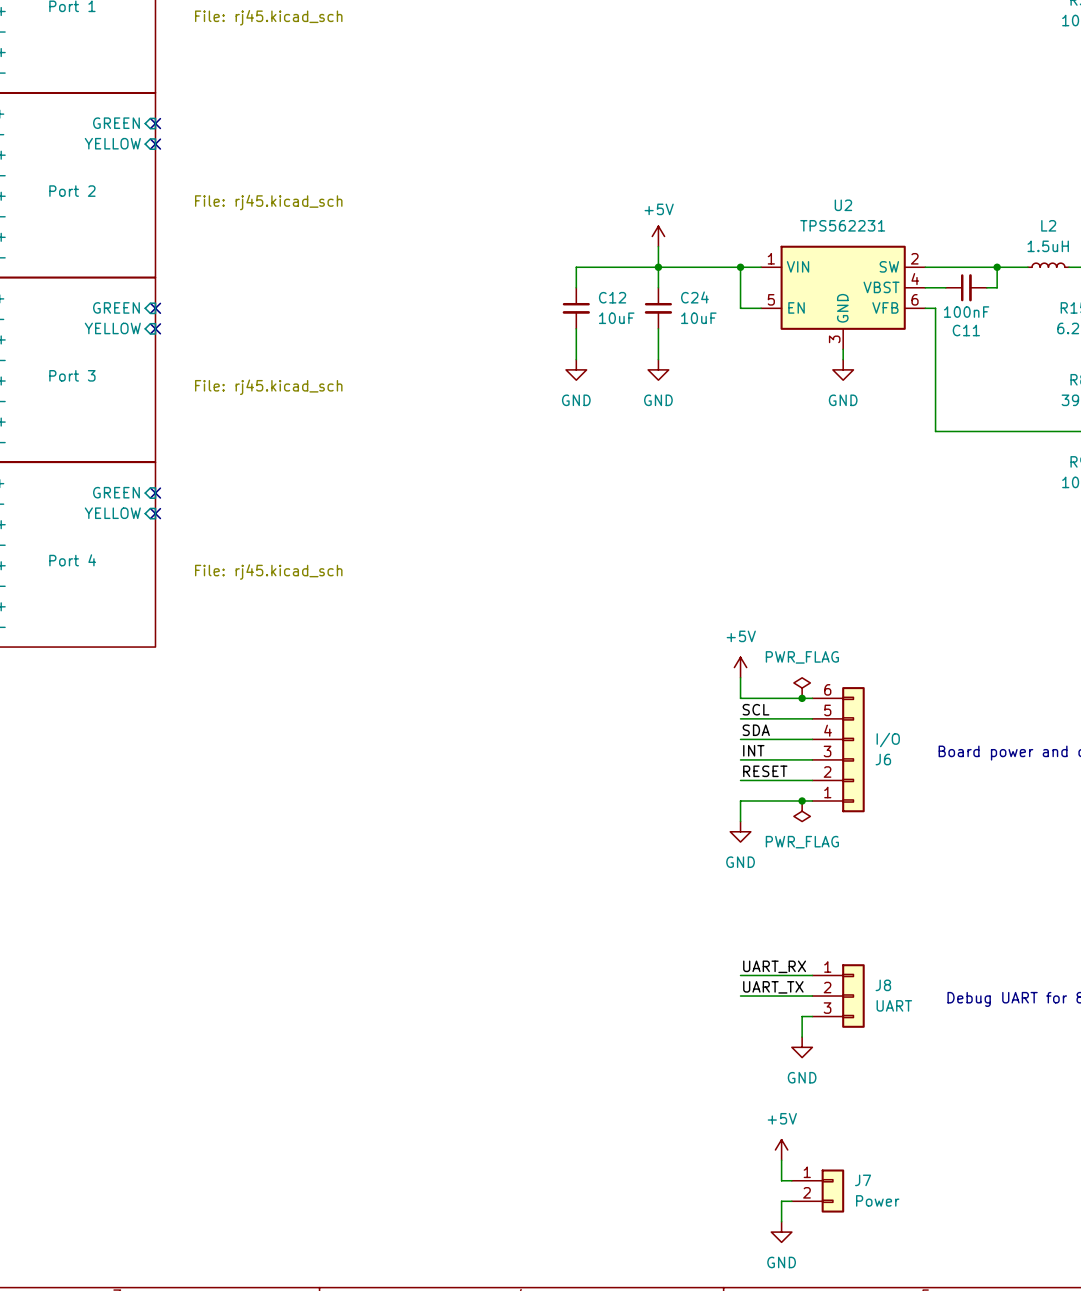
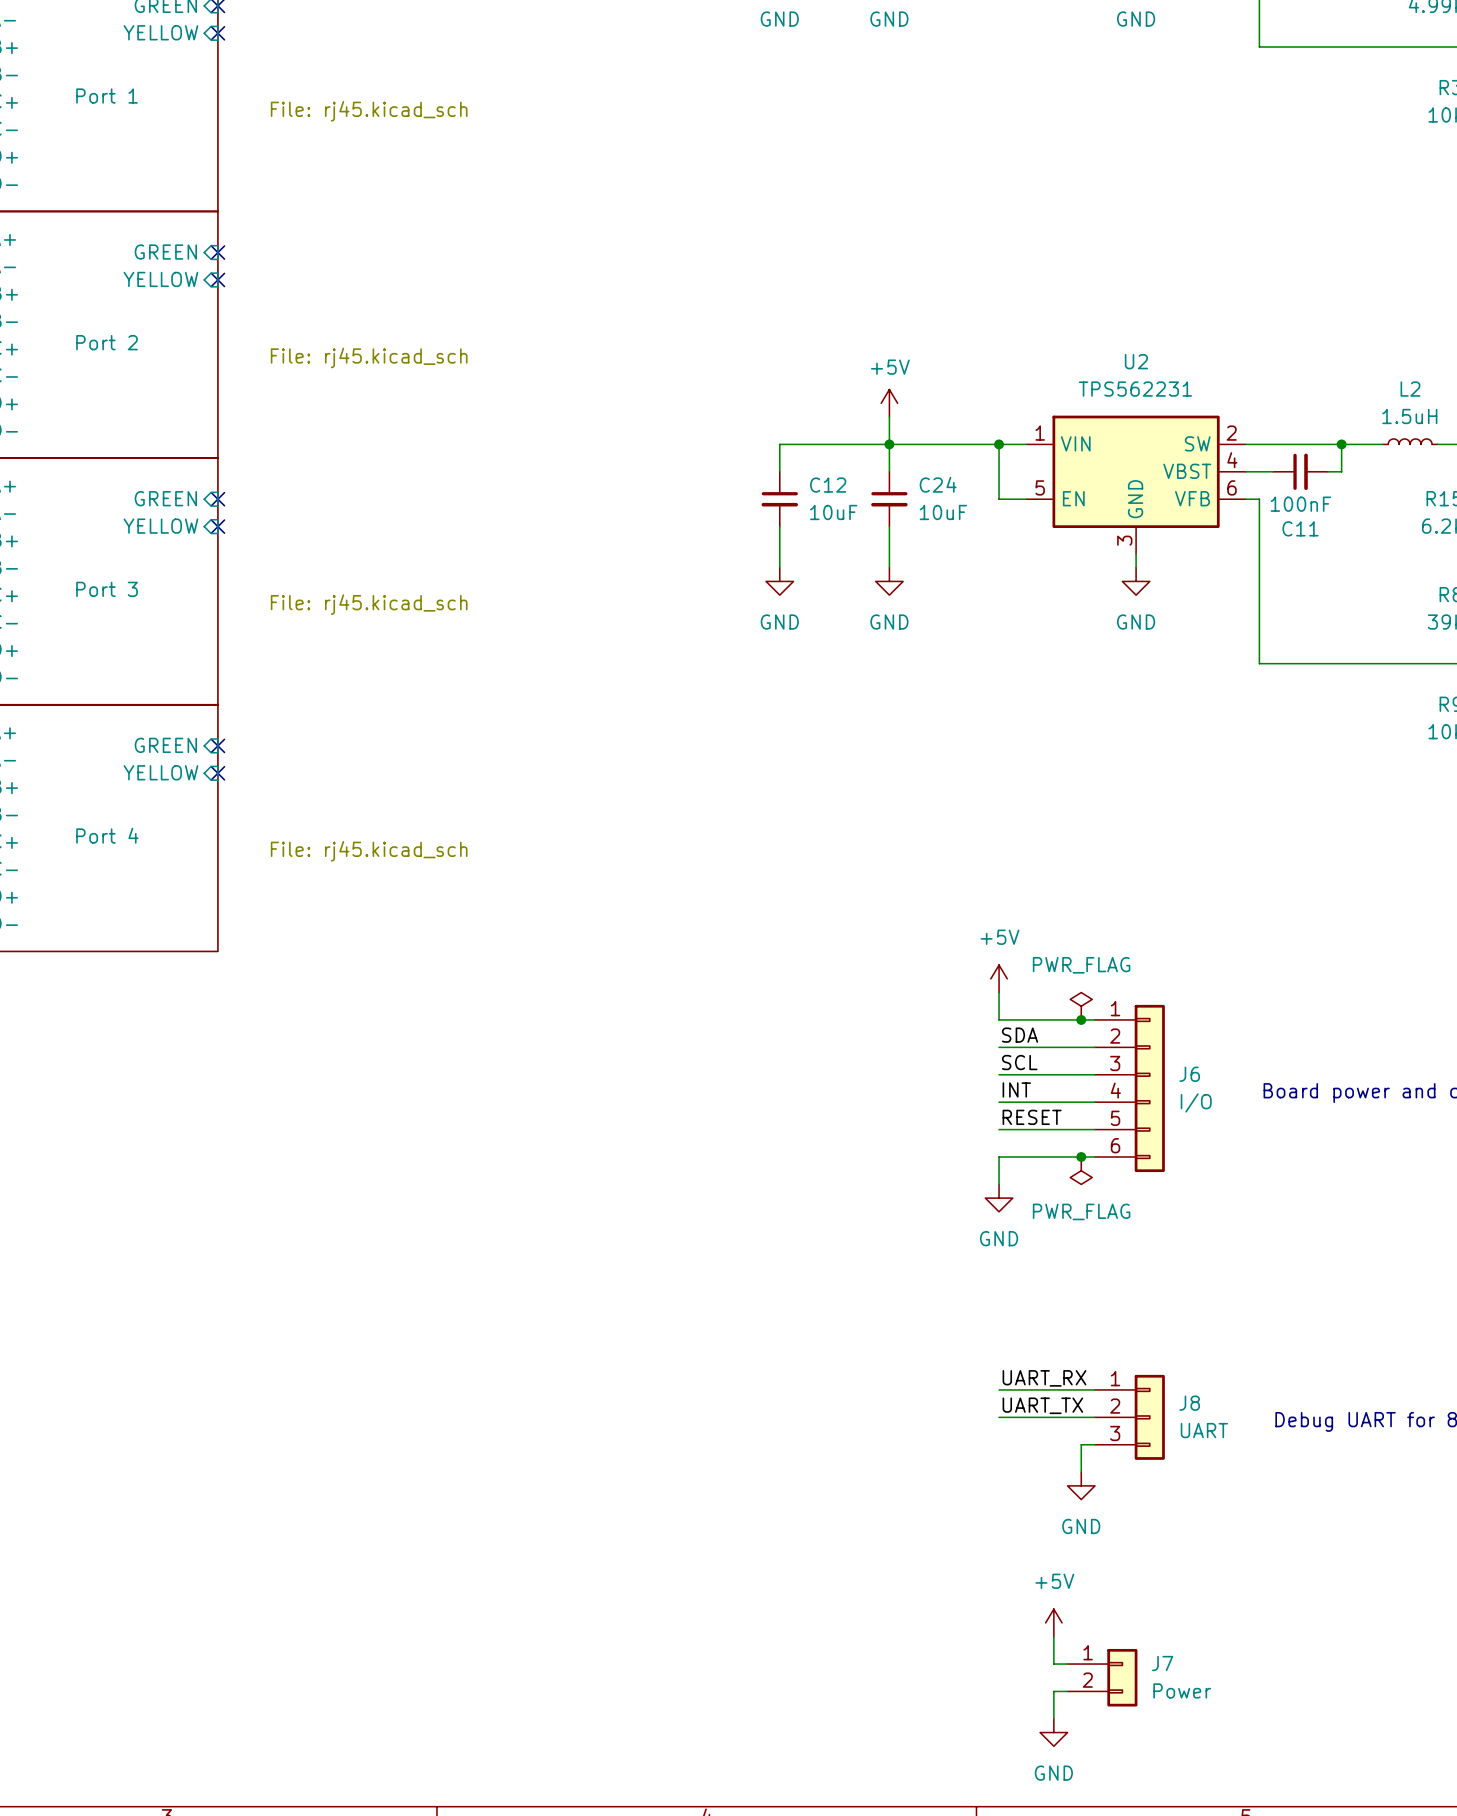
label: SCL (756, 709) -> SDA (1020, 1035)
label: SDA (756, 730) -> SCL (1019, 1062)
J6 flip: as is (853, 749) -> up-down (1149, 1088)

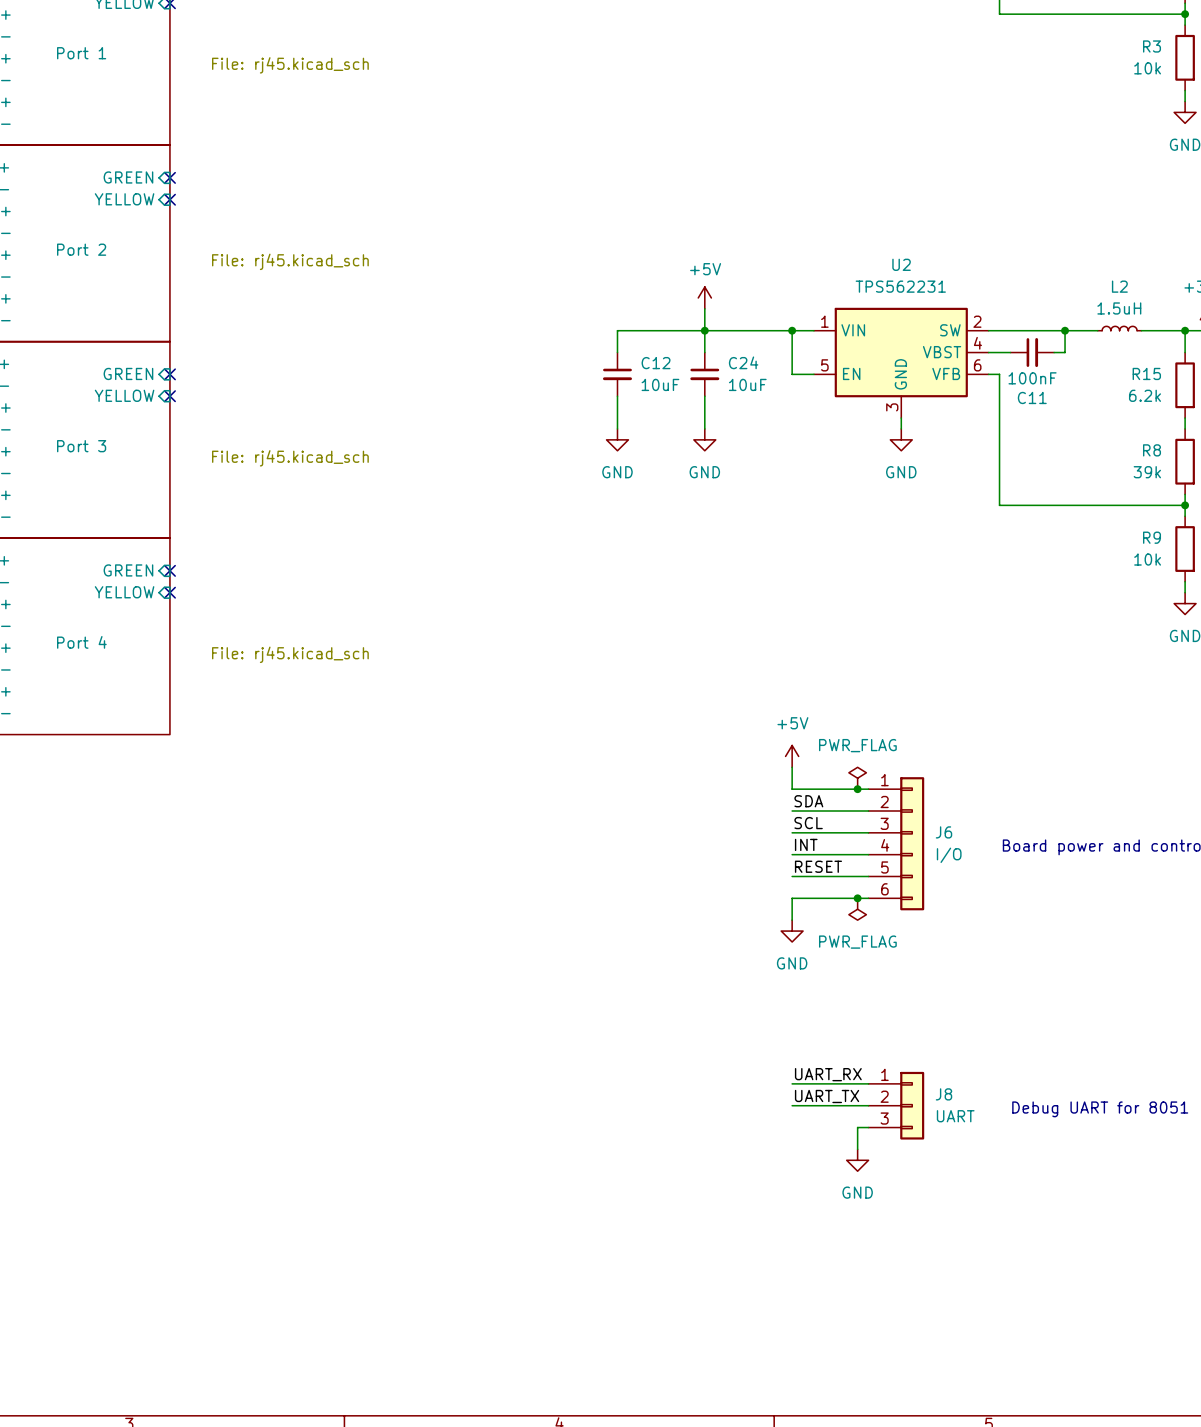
power symbol: +5V (1053, 1622) -> none
wire: (1053, 1636) (1053, 1664) (1067, 1664) -> none
J7: Power (1102, 1677) -> none
wire: (1067, 1691) (1053, 1691) (1053, 1718) -> none
power symbol: GND (1053, 1732) -> none

